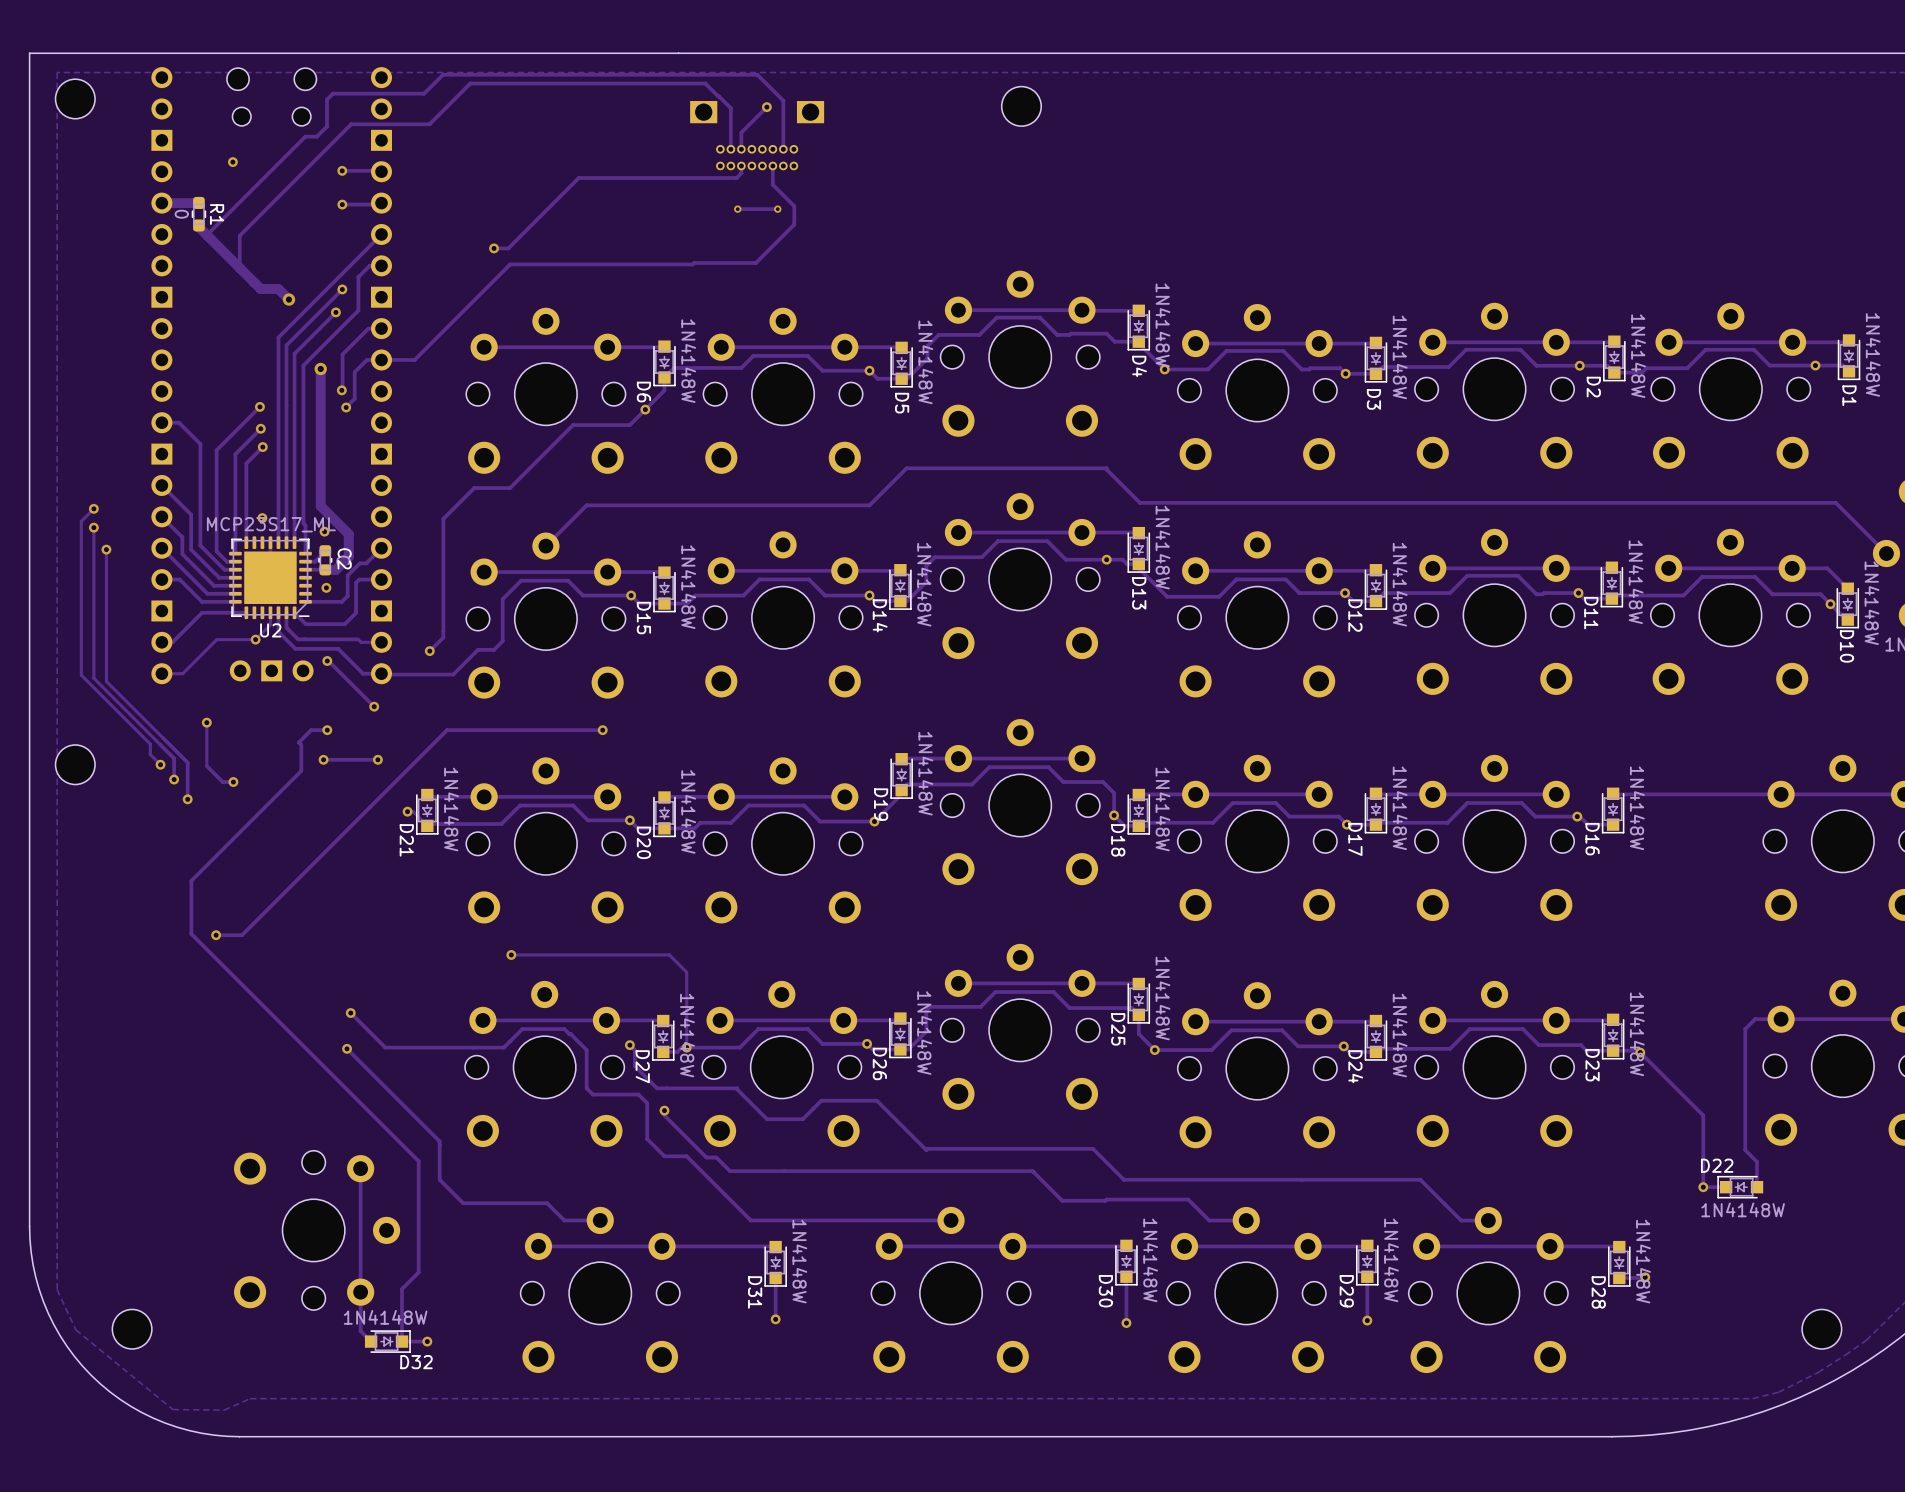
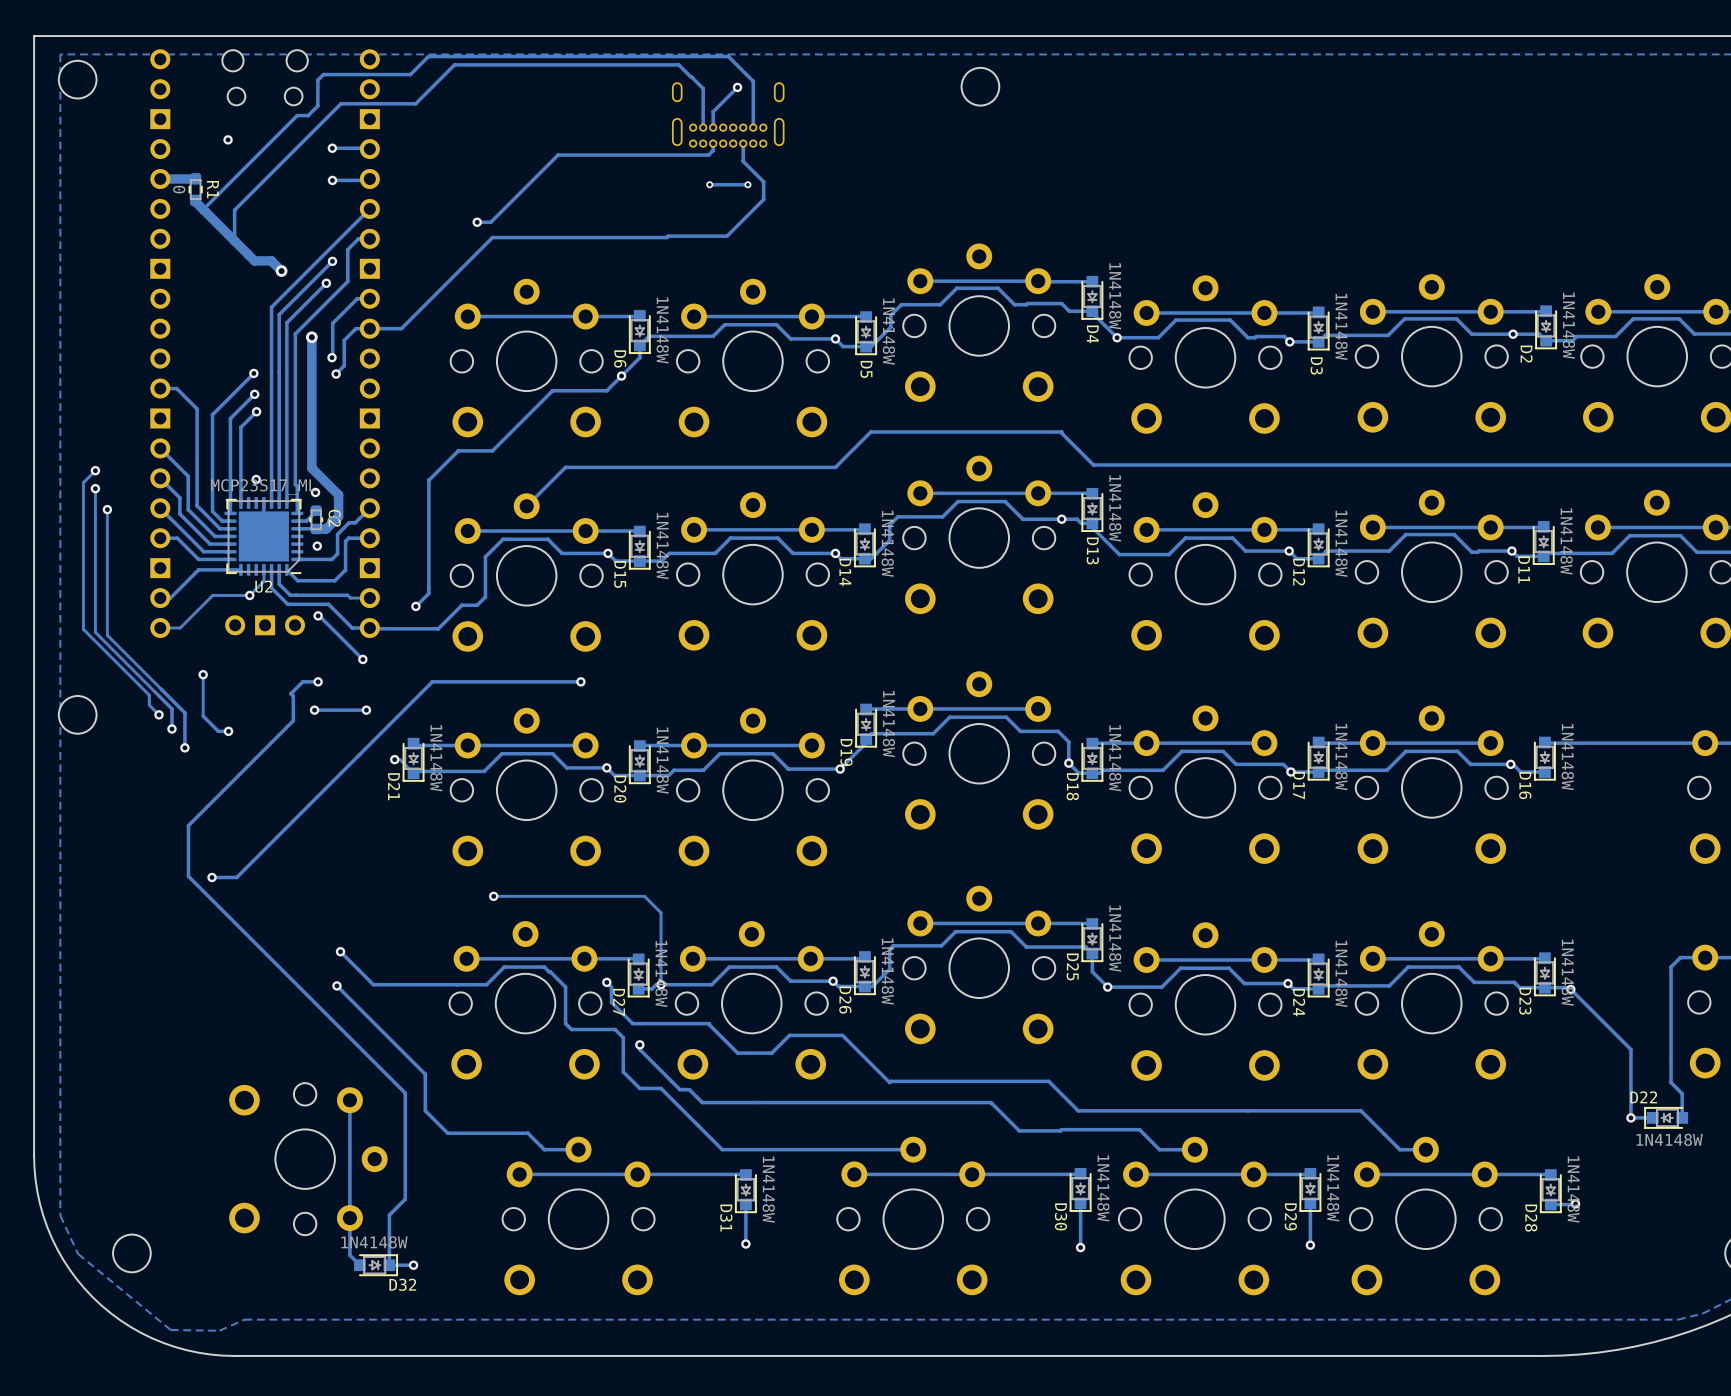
part footprint: [690, 101, 825, 171] -> [671, 82, 785, 148]

